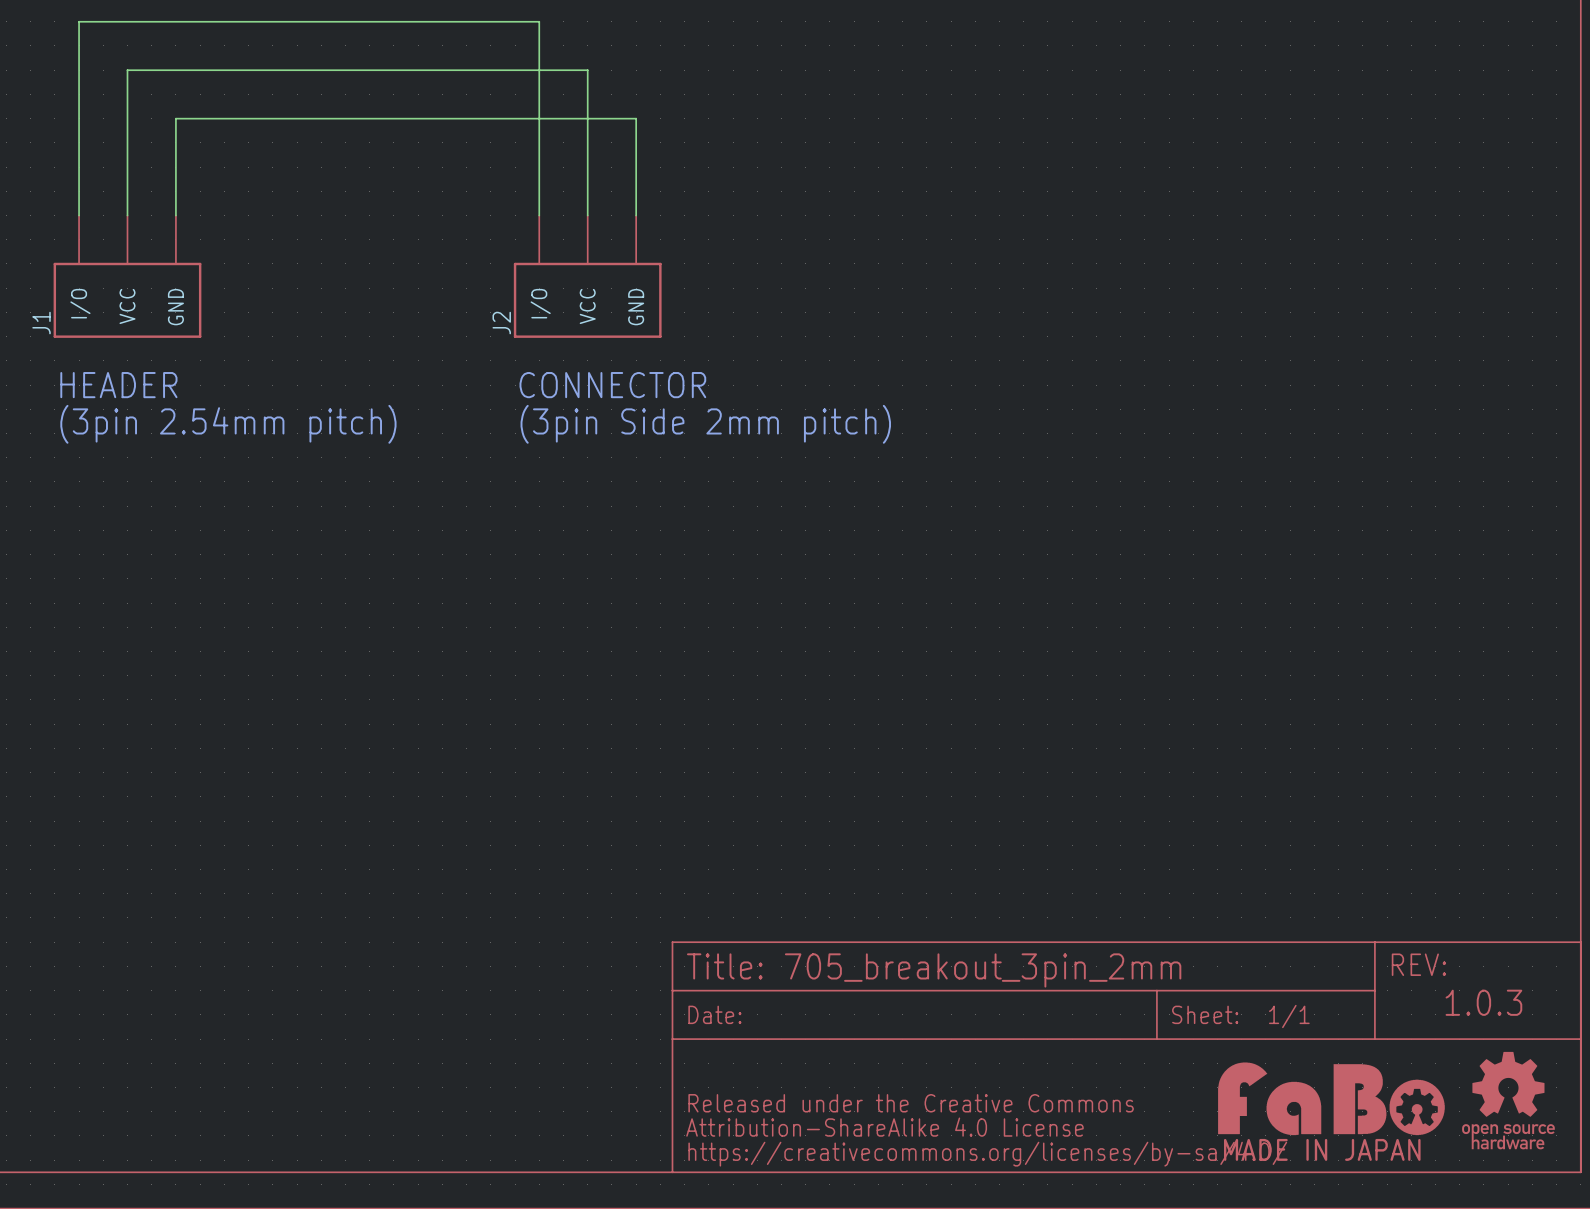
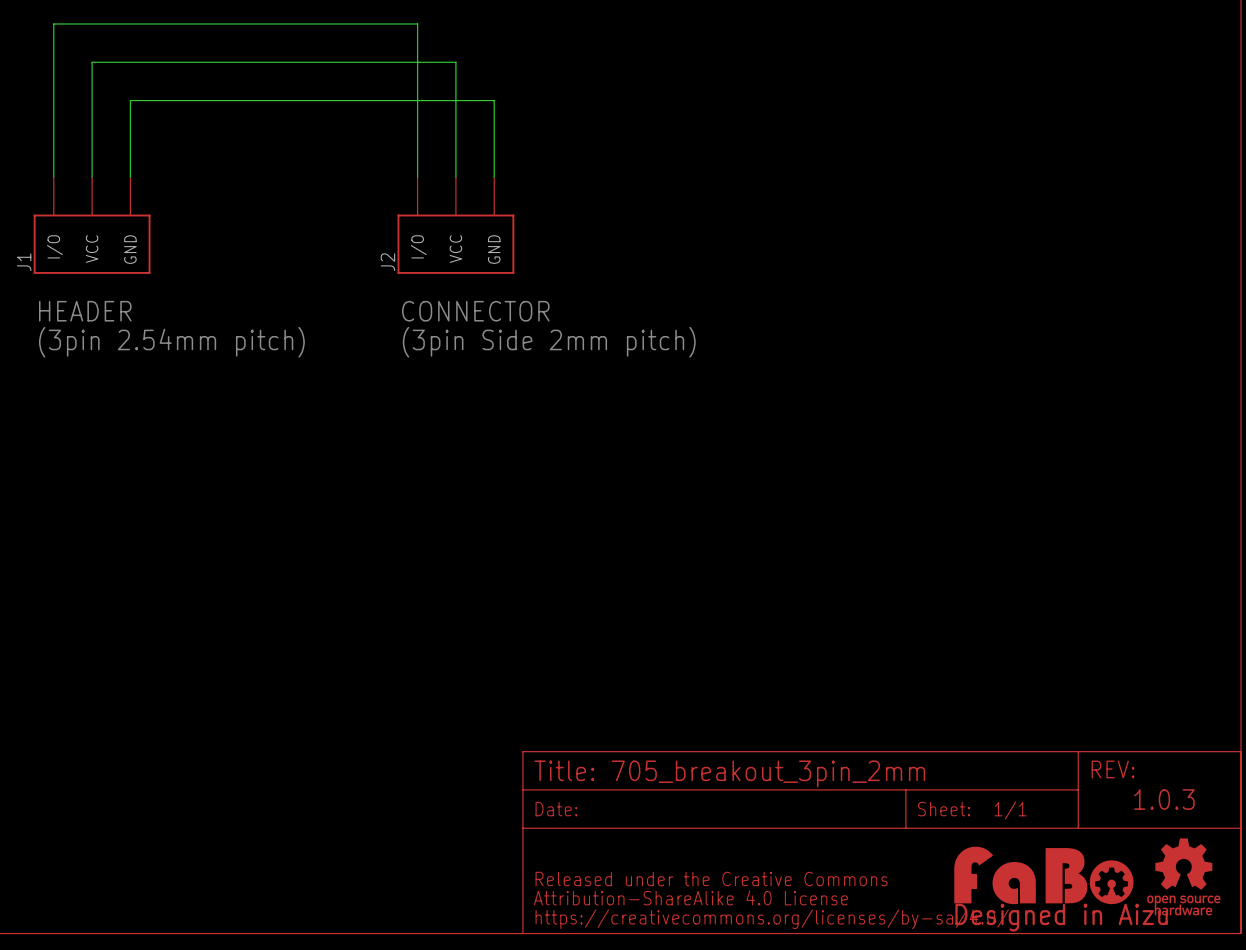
part text: MADE IN JAPAN (1322, 1149) -> none
part text: none -> Designed in Aizu (1061, 917)

